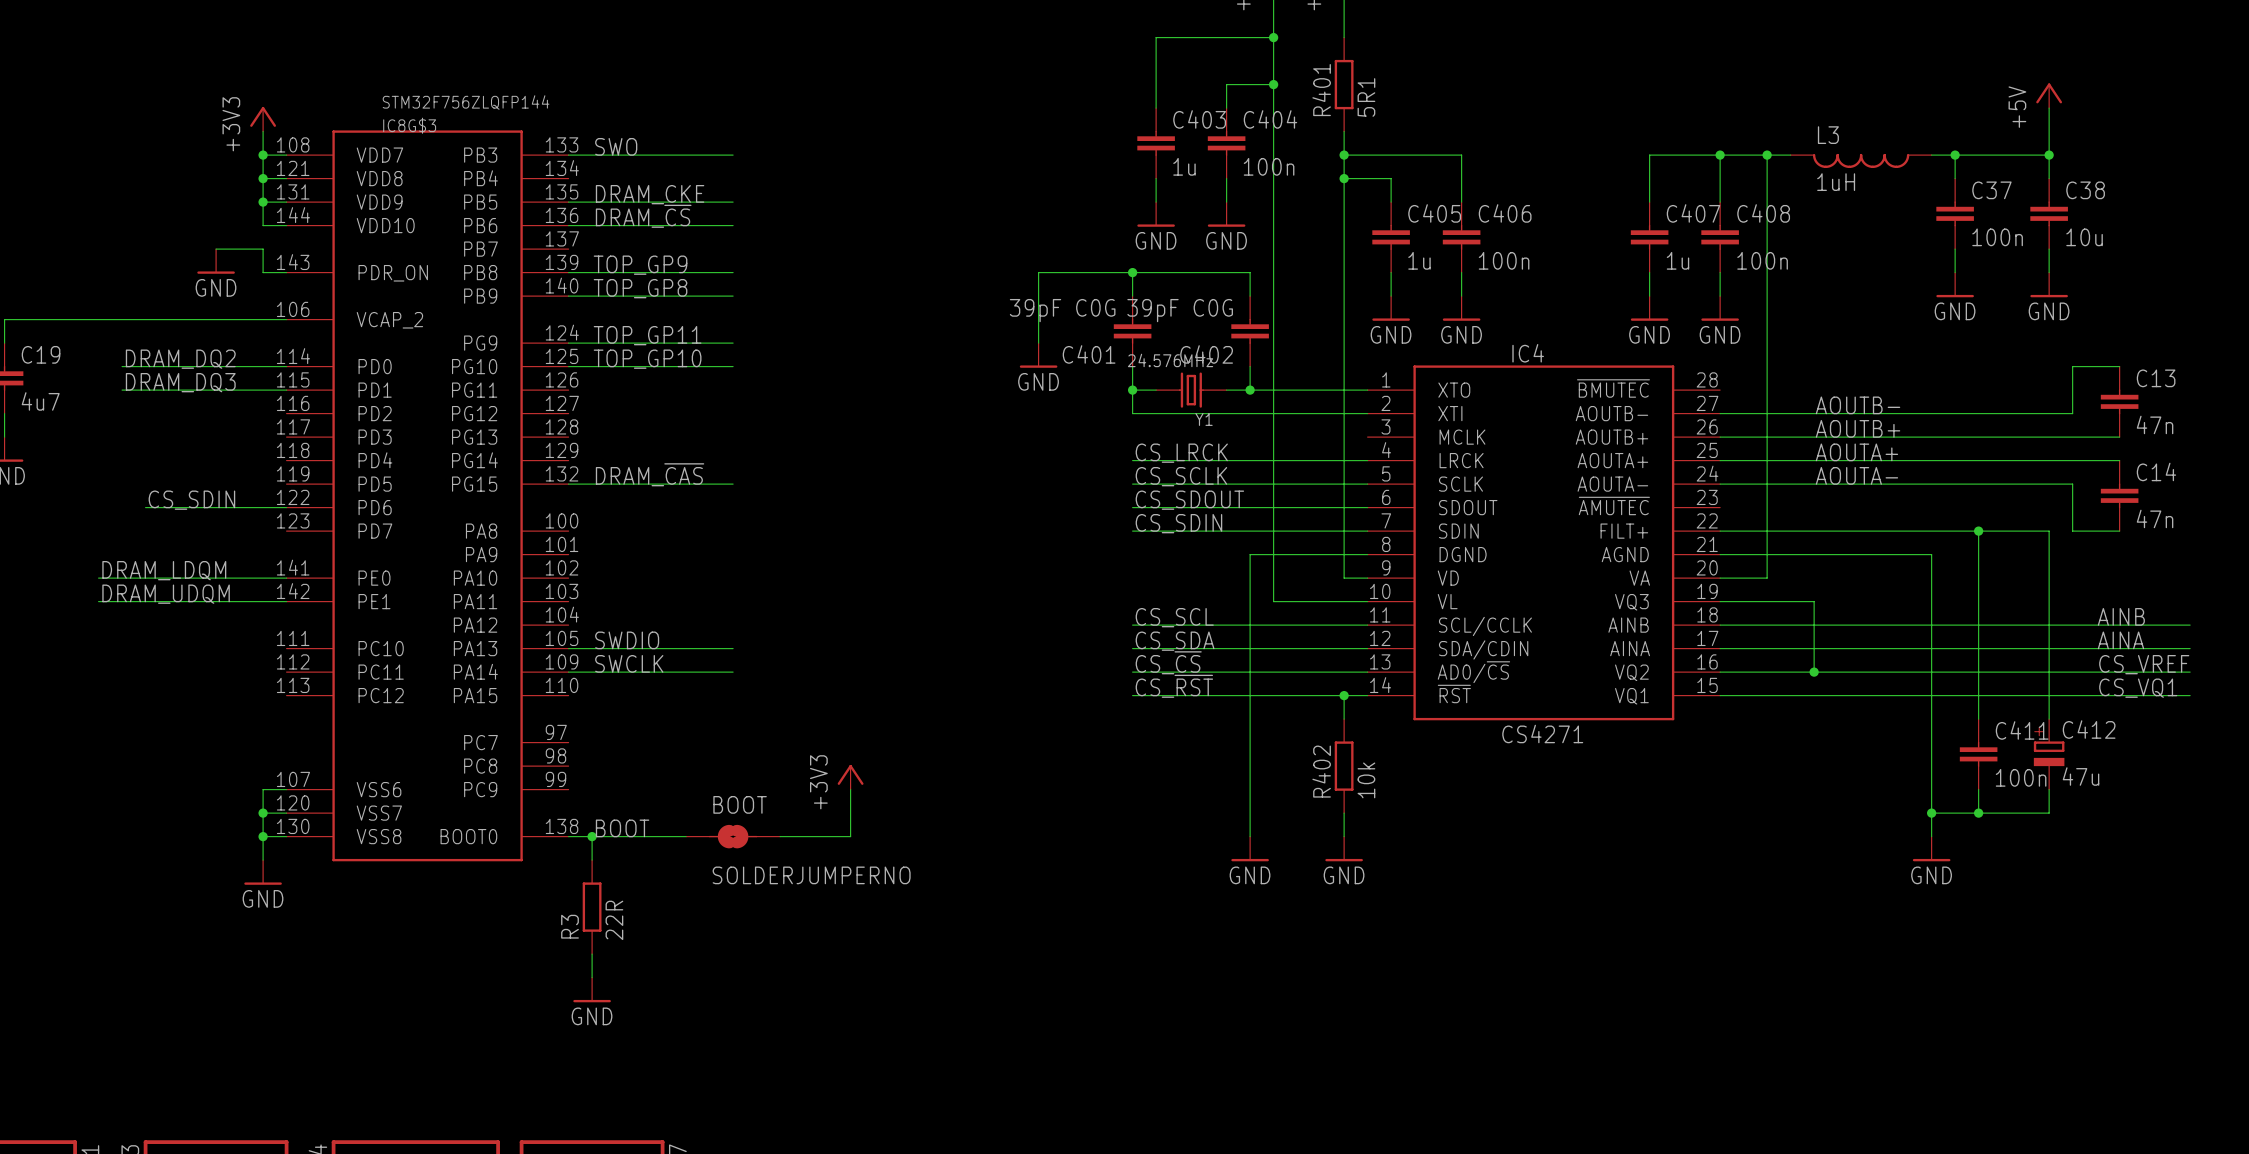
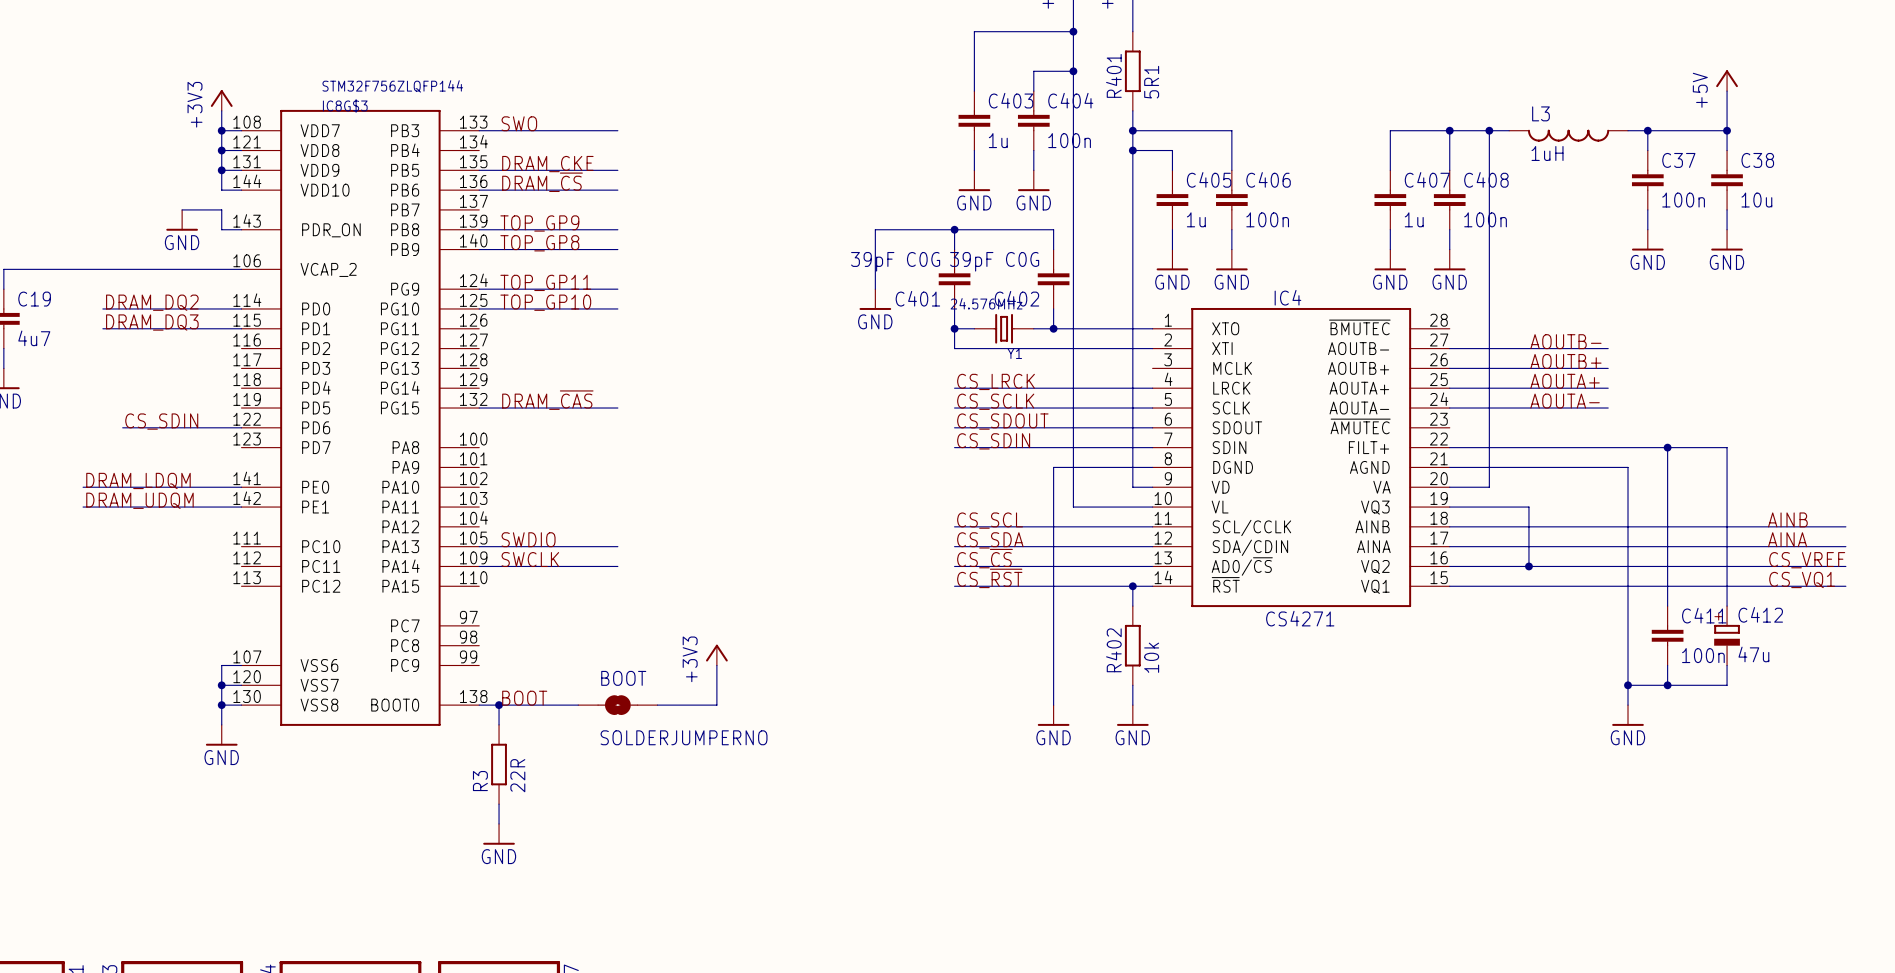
wire: (2119, 366) (2072, 366) (2072, 413) (1908, 413) -> none
C13: 47n (2119, 401) -> none
wire: (1908, 437) (2119, 437) -> none
wire: (1908, 460) (2119, 460) -> none
wire: (1908, 484) (2072, 484) (2072, 531) (2119, 531) -> none
C14: 47n (2119, 495) -> none

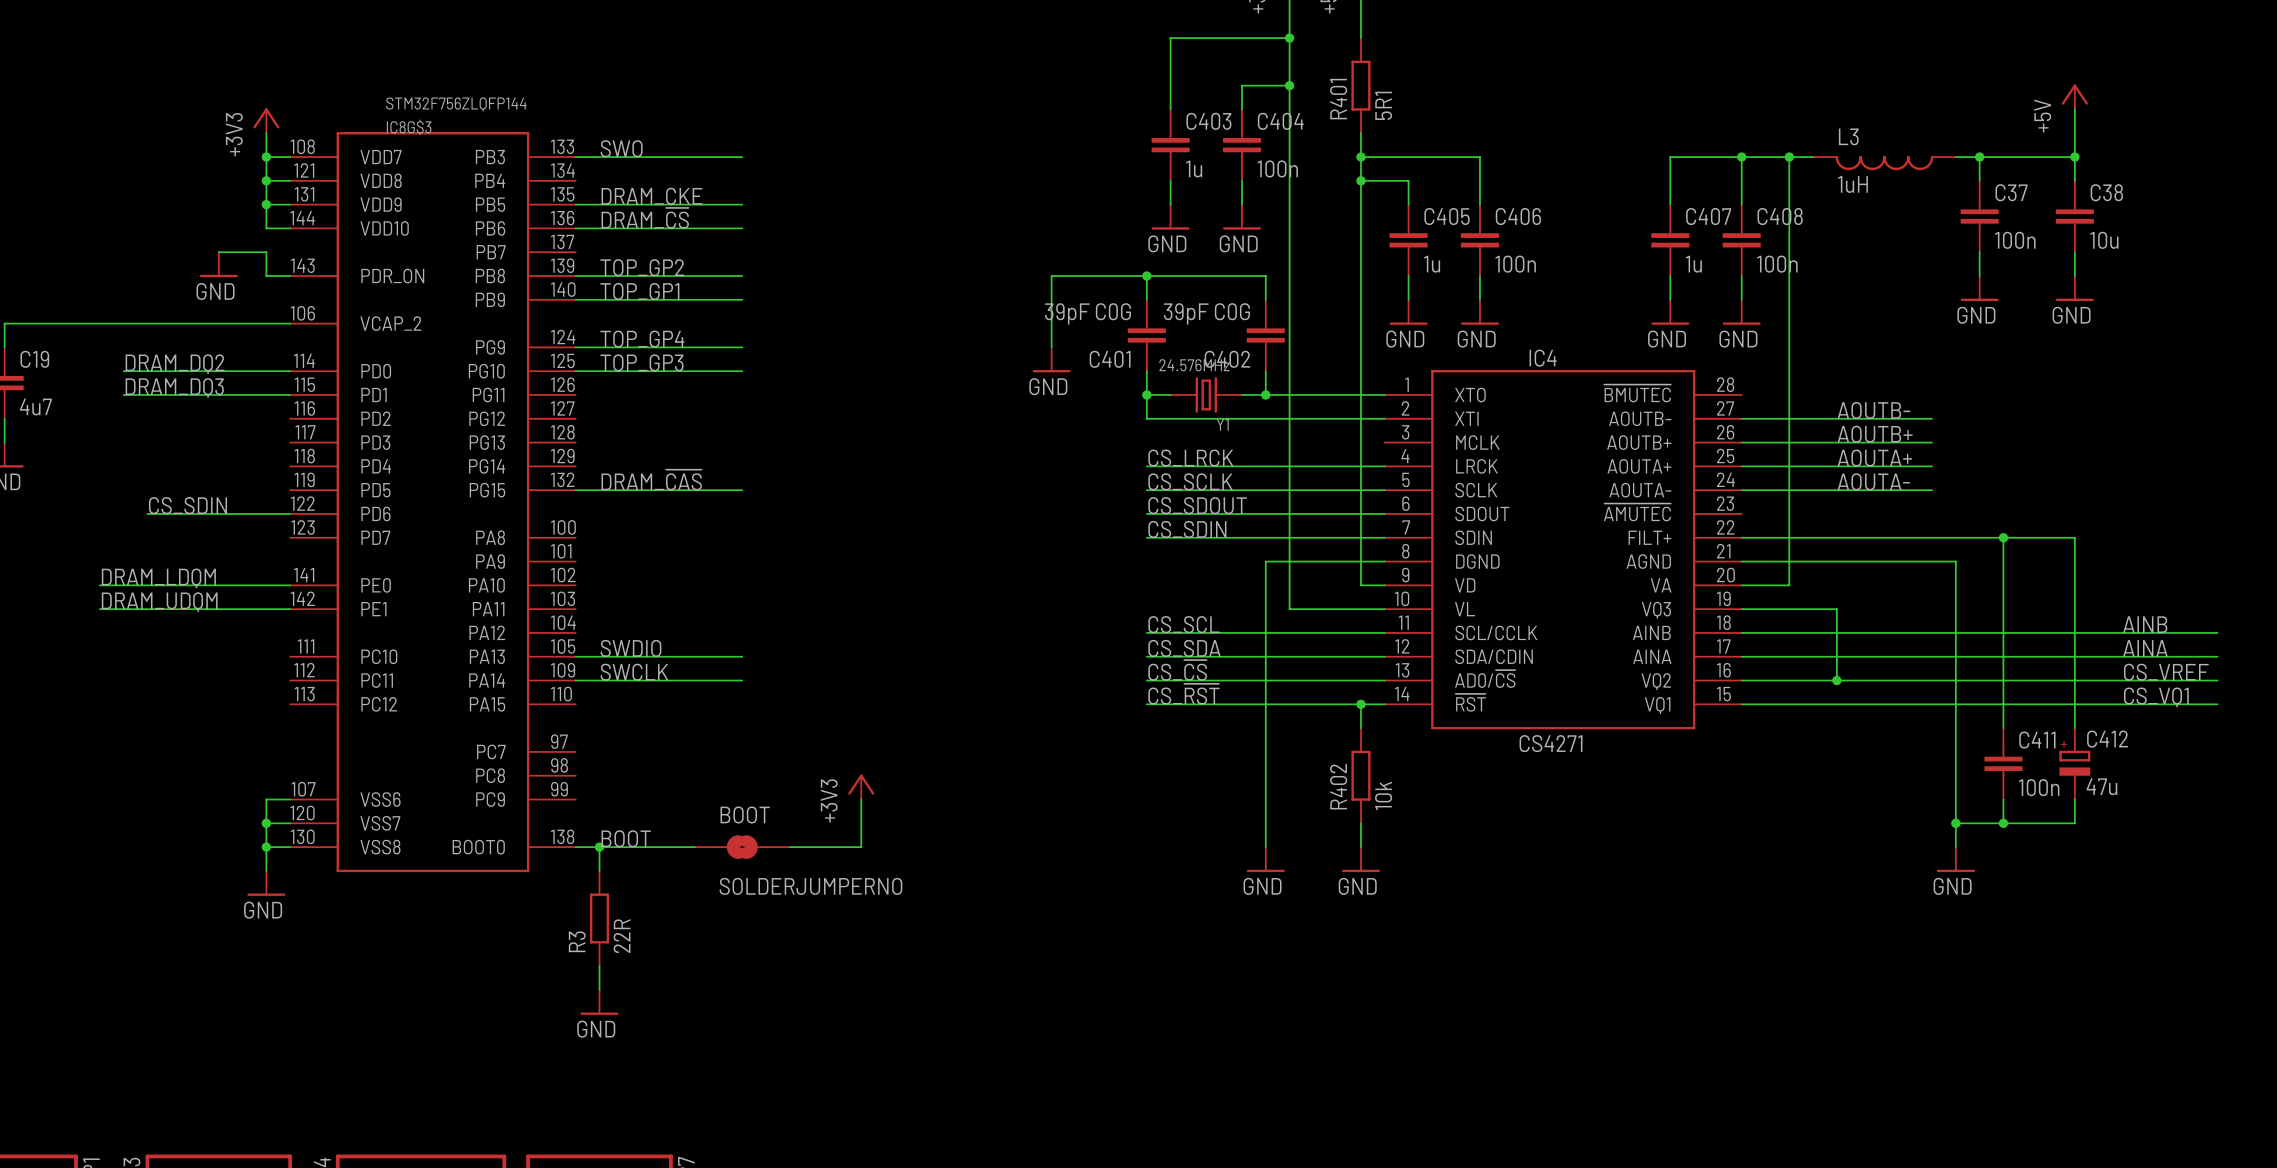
label: TOP_GP9 (539, 223) -> TOP_GP2 (642, 267)
label: TOP_GP8 (539, 243) -> TOP_GP1 (639, 291)
label: TOP_GP11 (545, 282) -> TOP_GP4 (642, 339)
label: TOP_GP10 (545, 302) -> TOP_GP3 (641, 362)

